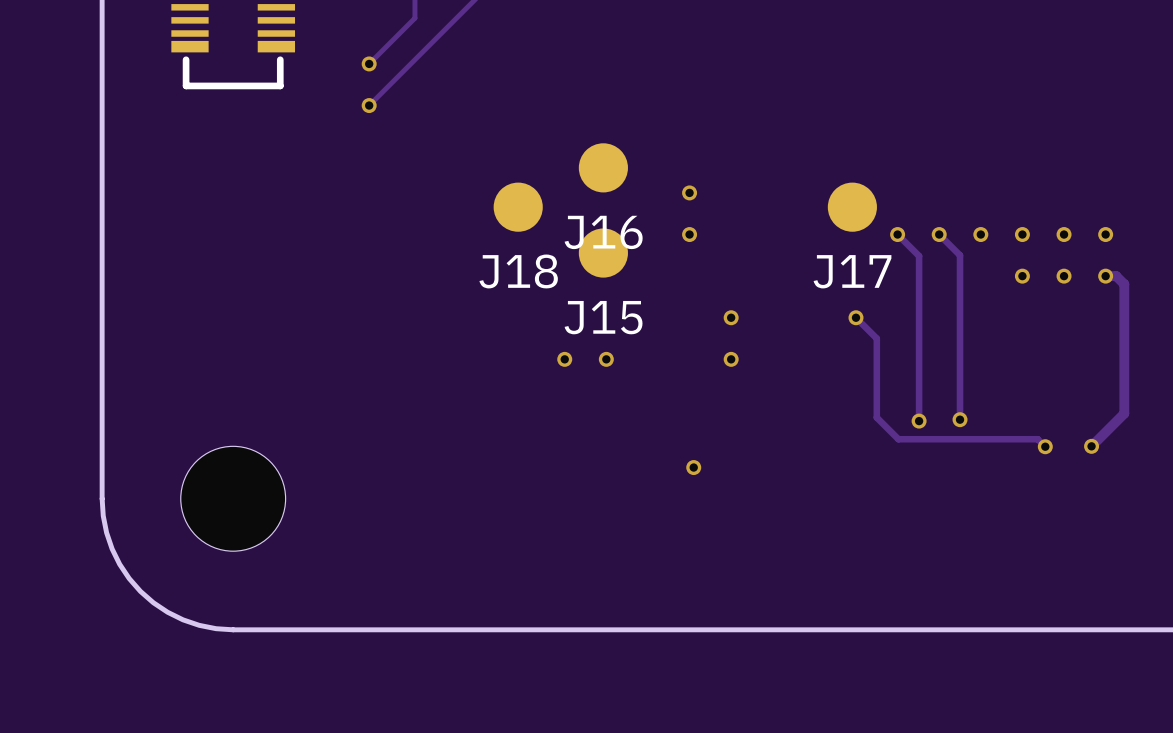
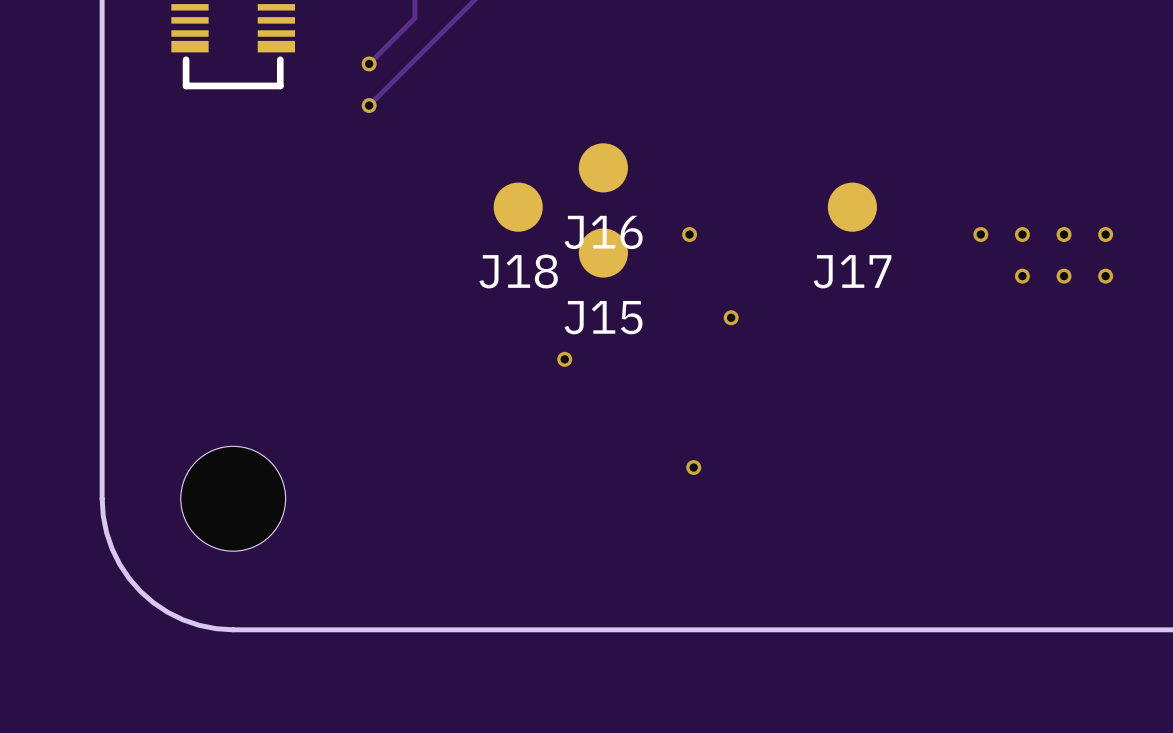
via: (689, 192) -> none
track: (897, 234) (919, 256) (919, 421) -> none
via: (897, 234) -> none
track: (939, 234) (960, 255) (960, 419) -> none
via: (939, 234) -> none
track: (1105, 276) (1116, 276) (1124, 284) (1124, 413) (1091, 446) -> none
track: (855, 317) (876, 338) (876, 417) (898, 439) (1037, 439) (1045, 446) -> none
via: (855, 317) -> none
via: (606, 359) -> none
via: (731, 359) -> none
via: (960, 419) -> none
via: (919, 421) -> none
via: (1045, 446) -> none
via: (1091, 446) -> none

